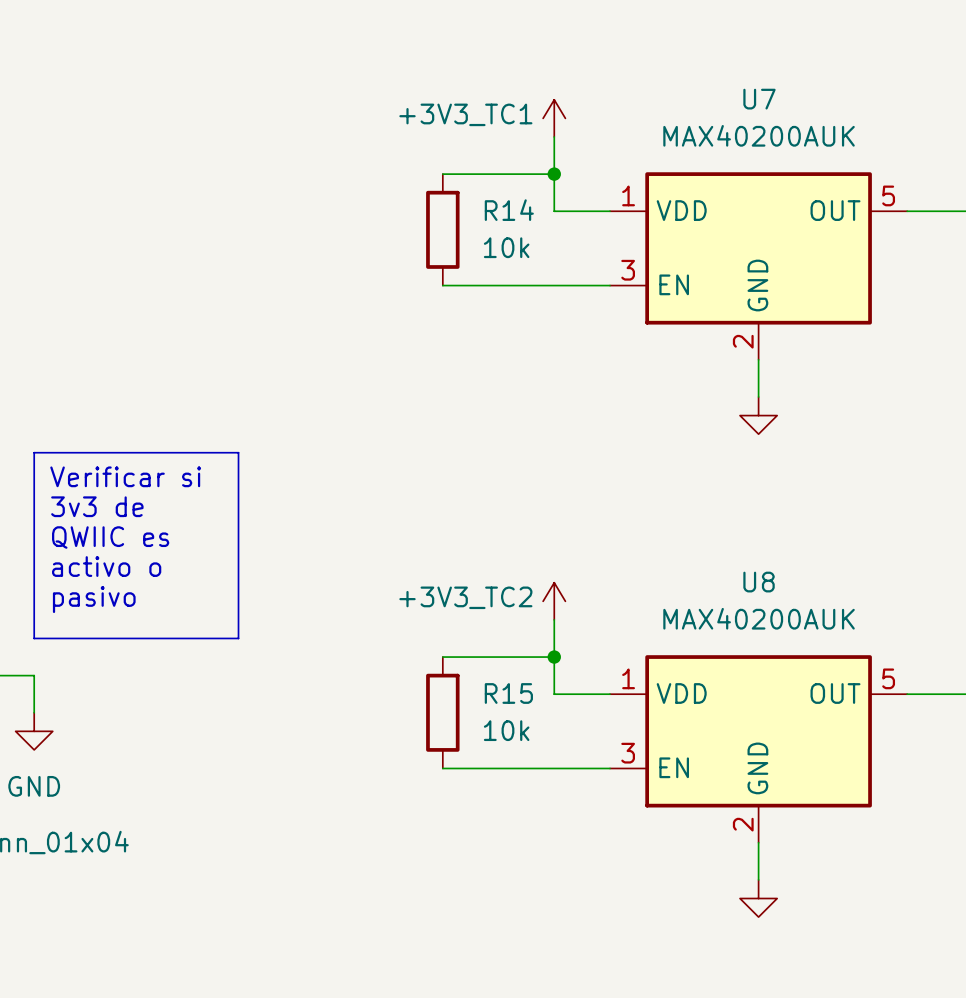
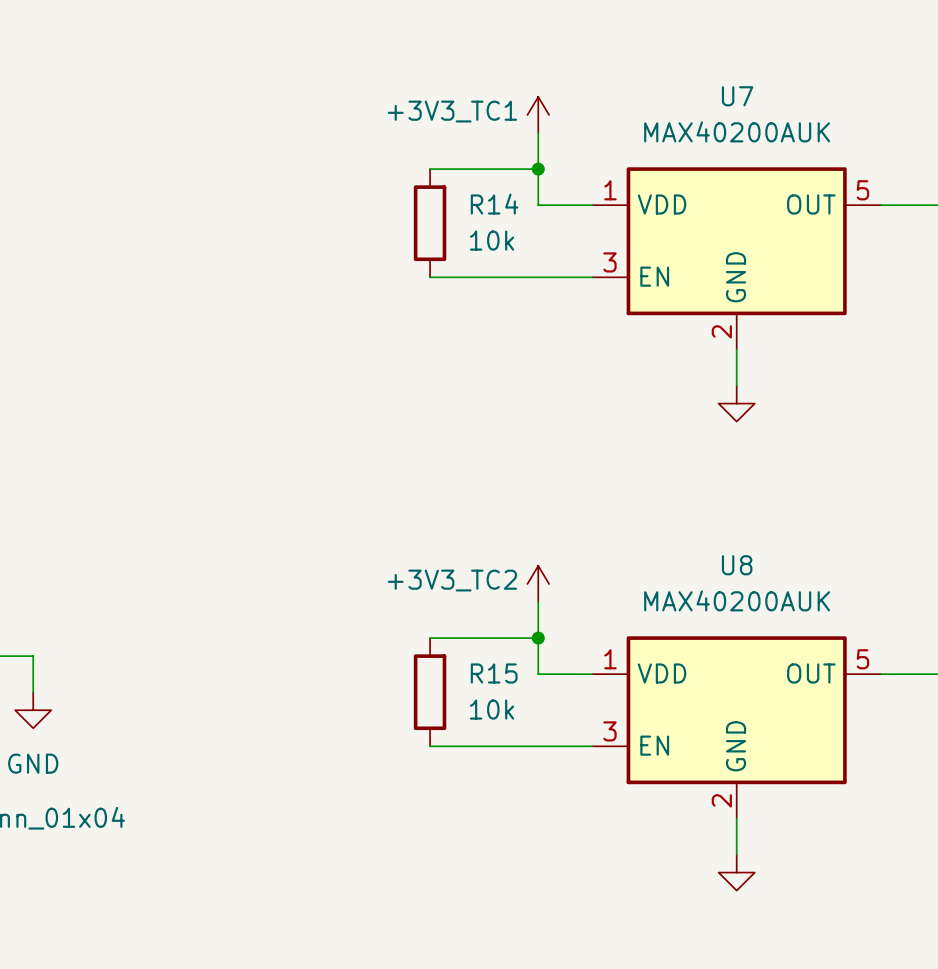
line: (34, 452) (238, 452) (238, 638) (34, 638) (34, 452) -> none
text: Verificar si (125, 476) -> none
text: 3v3 de (97, 506) -> none
text: QWIIC es (110, 537) -> none
text: activo o (106, 566) -> none
text: pasivo (94, 599) -> none

